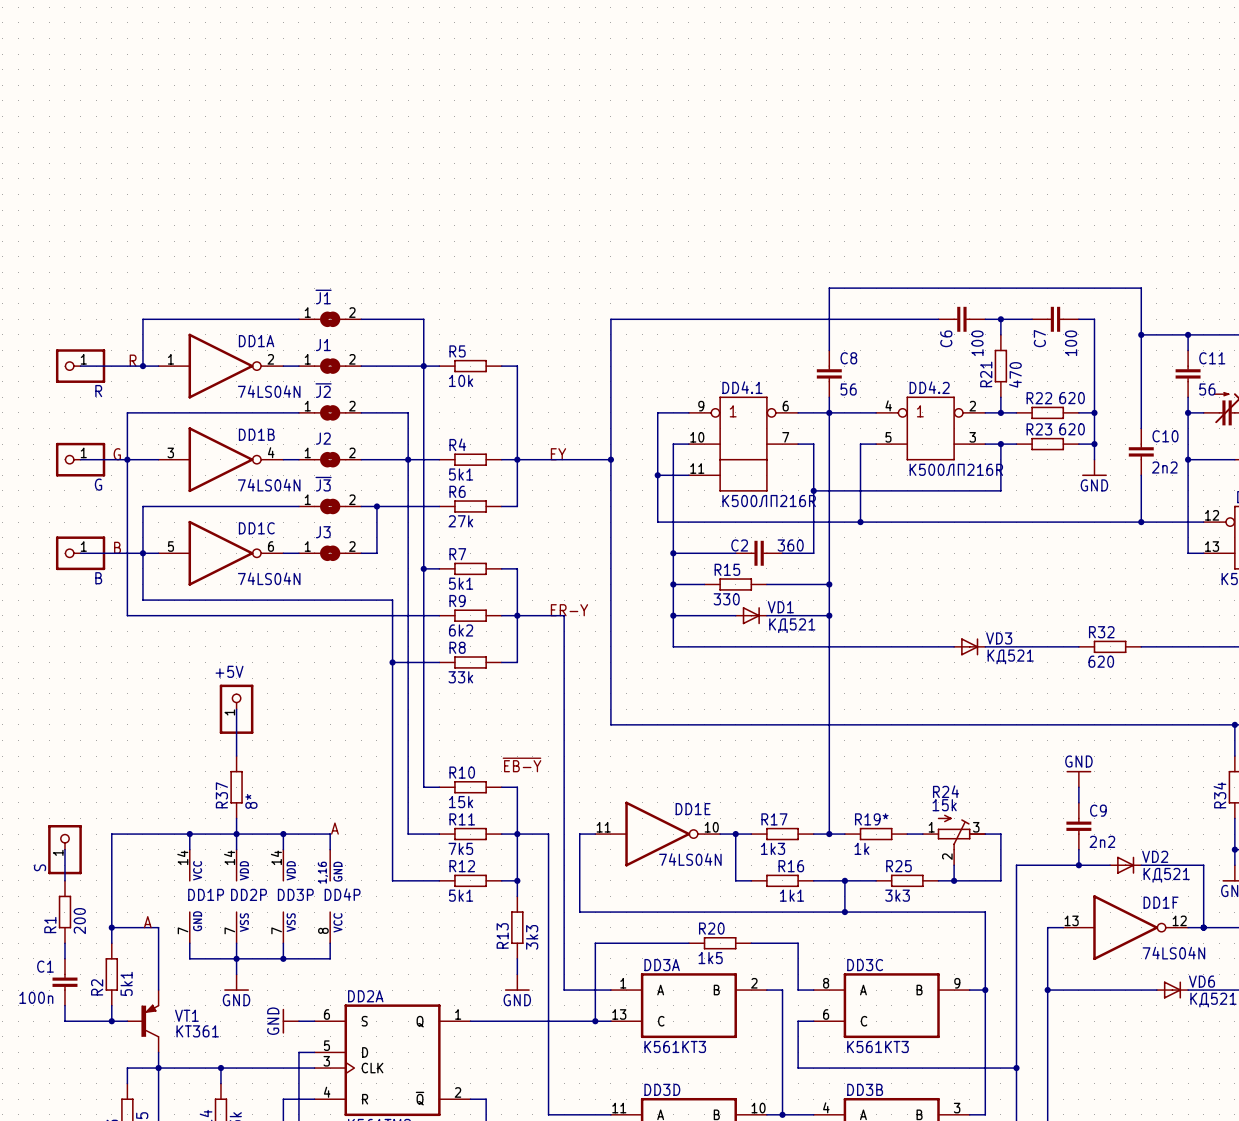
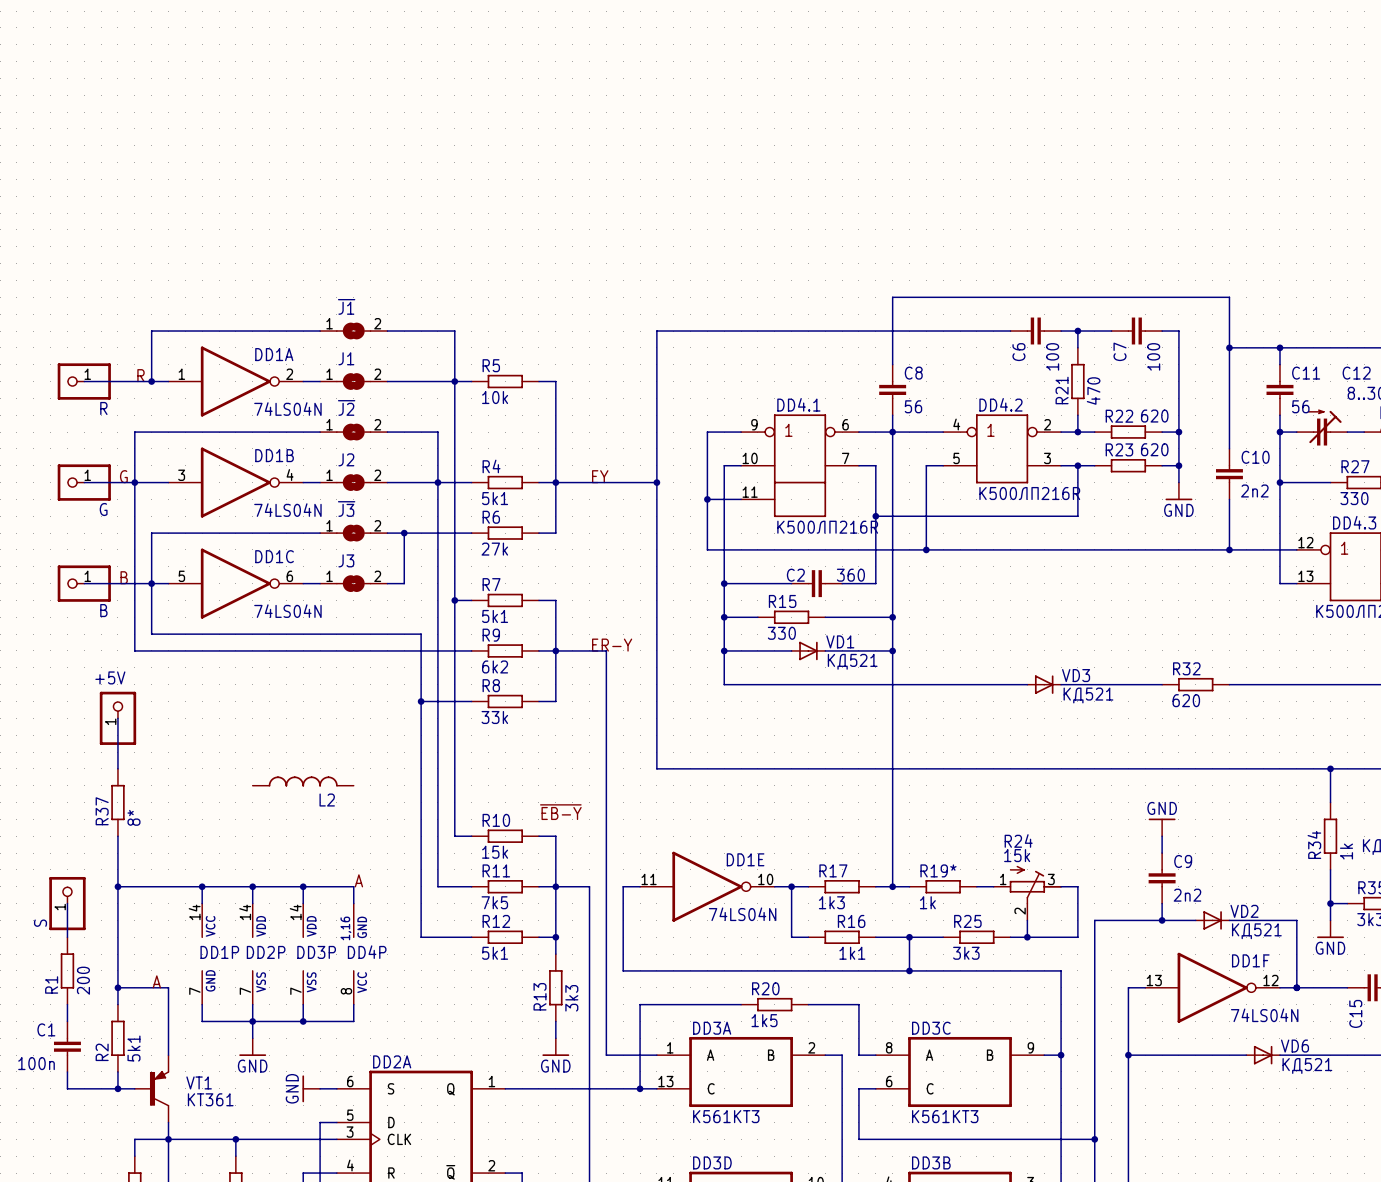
wire: (236, 709) (236, 756) -> (117, 718) (117, 768)
+5V position: (236, 709) -> (117, 718)
L2: none -> (303, 781)
wire: none -> (117, 836) (117, 886)
R37 position: (236, 787) -> (117, 802)
wire: (236, 818) (236, 834) -> none
junction: none -> (117, 886)

